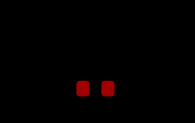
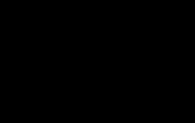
part: (95, 88) -> none

